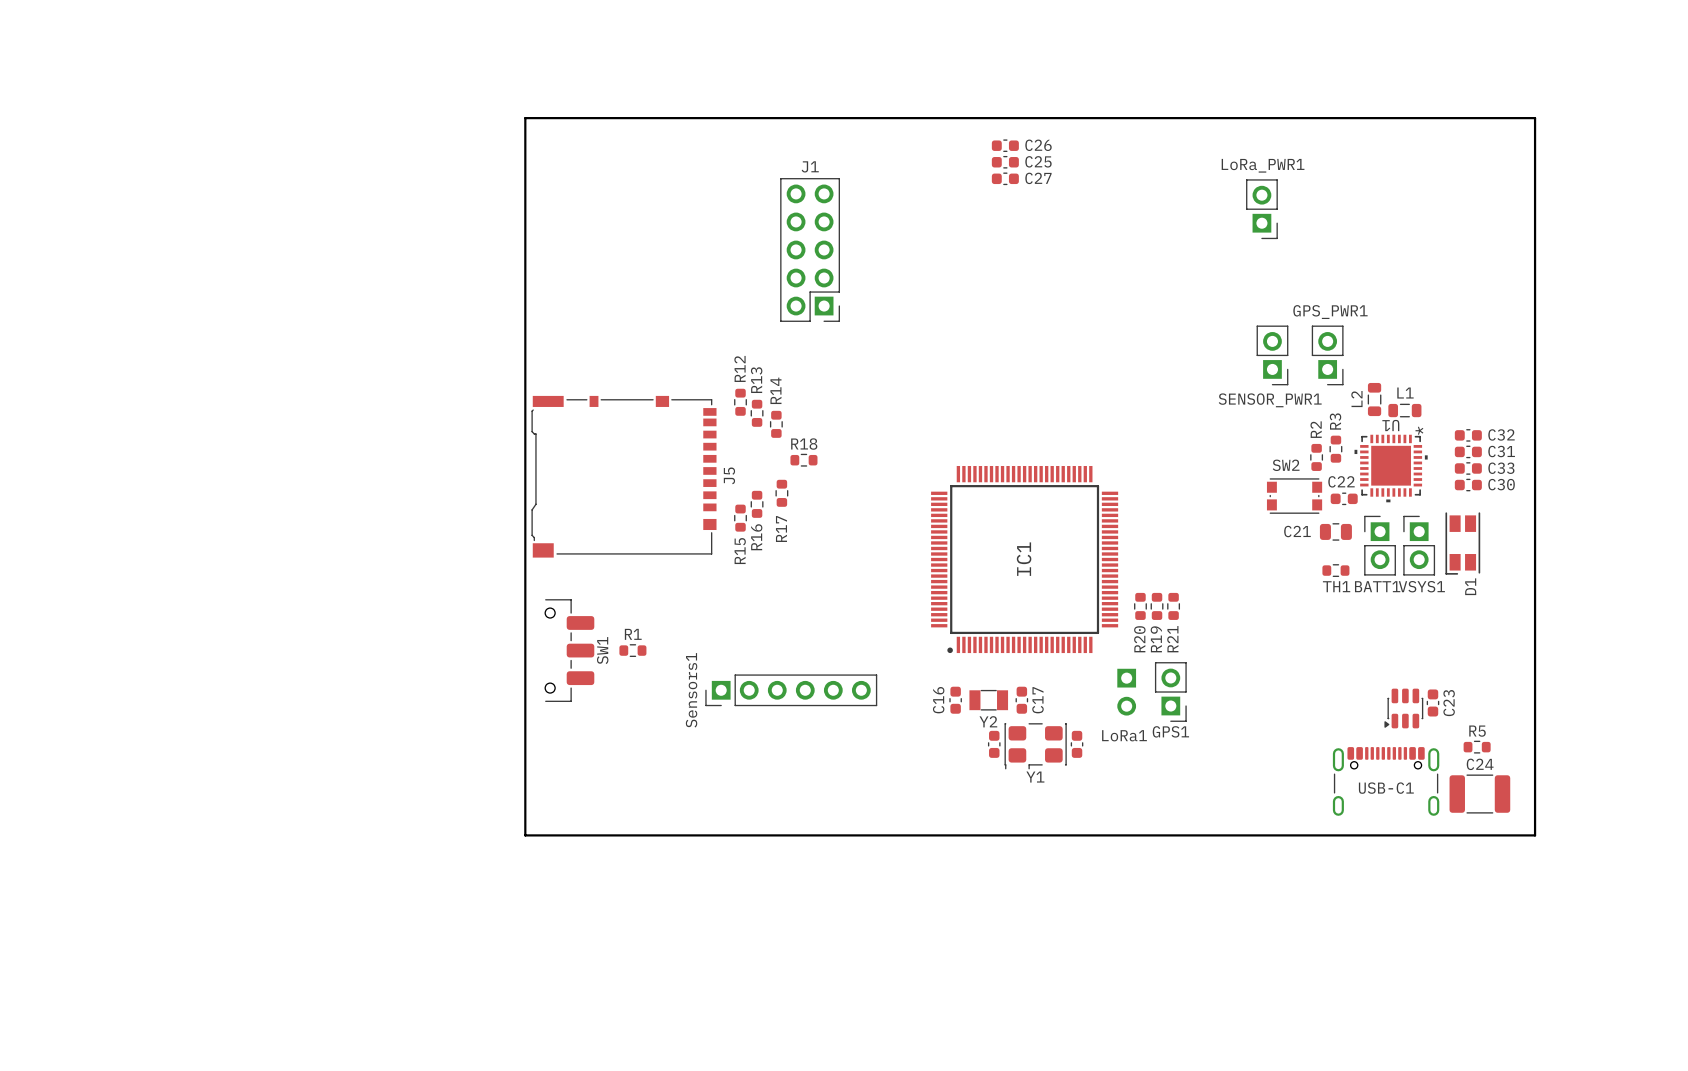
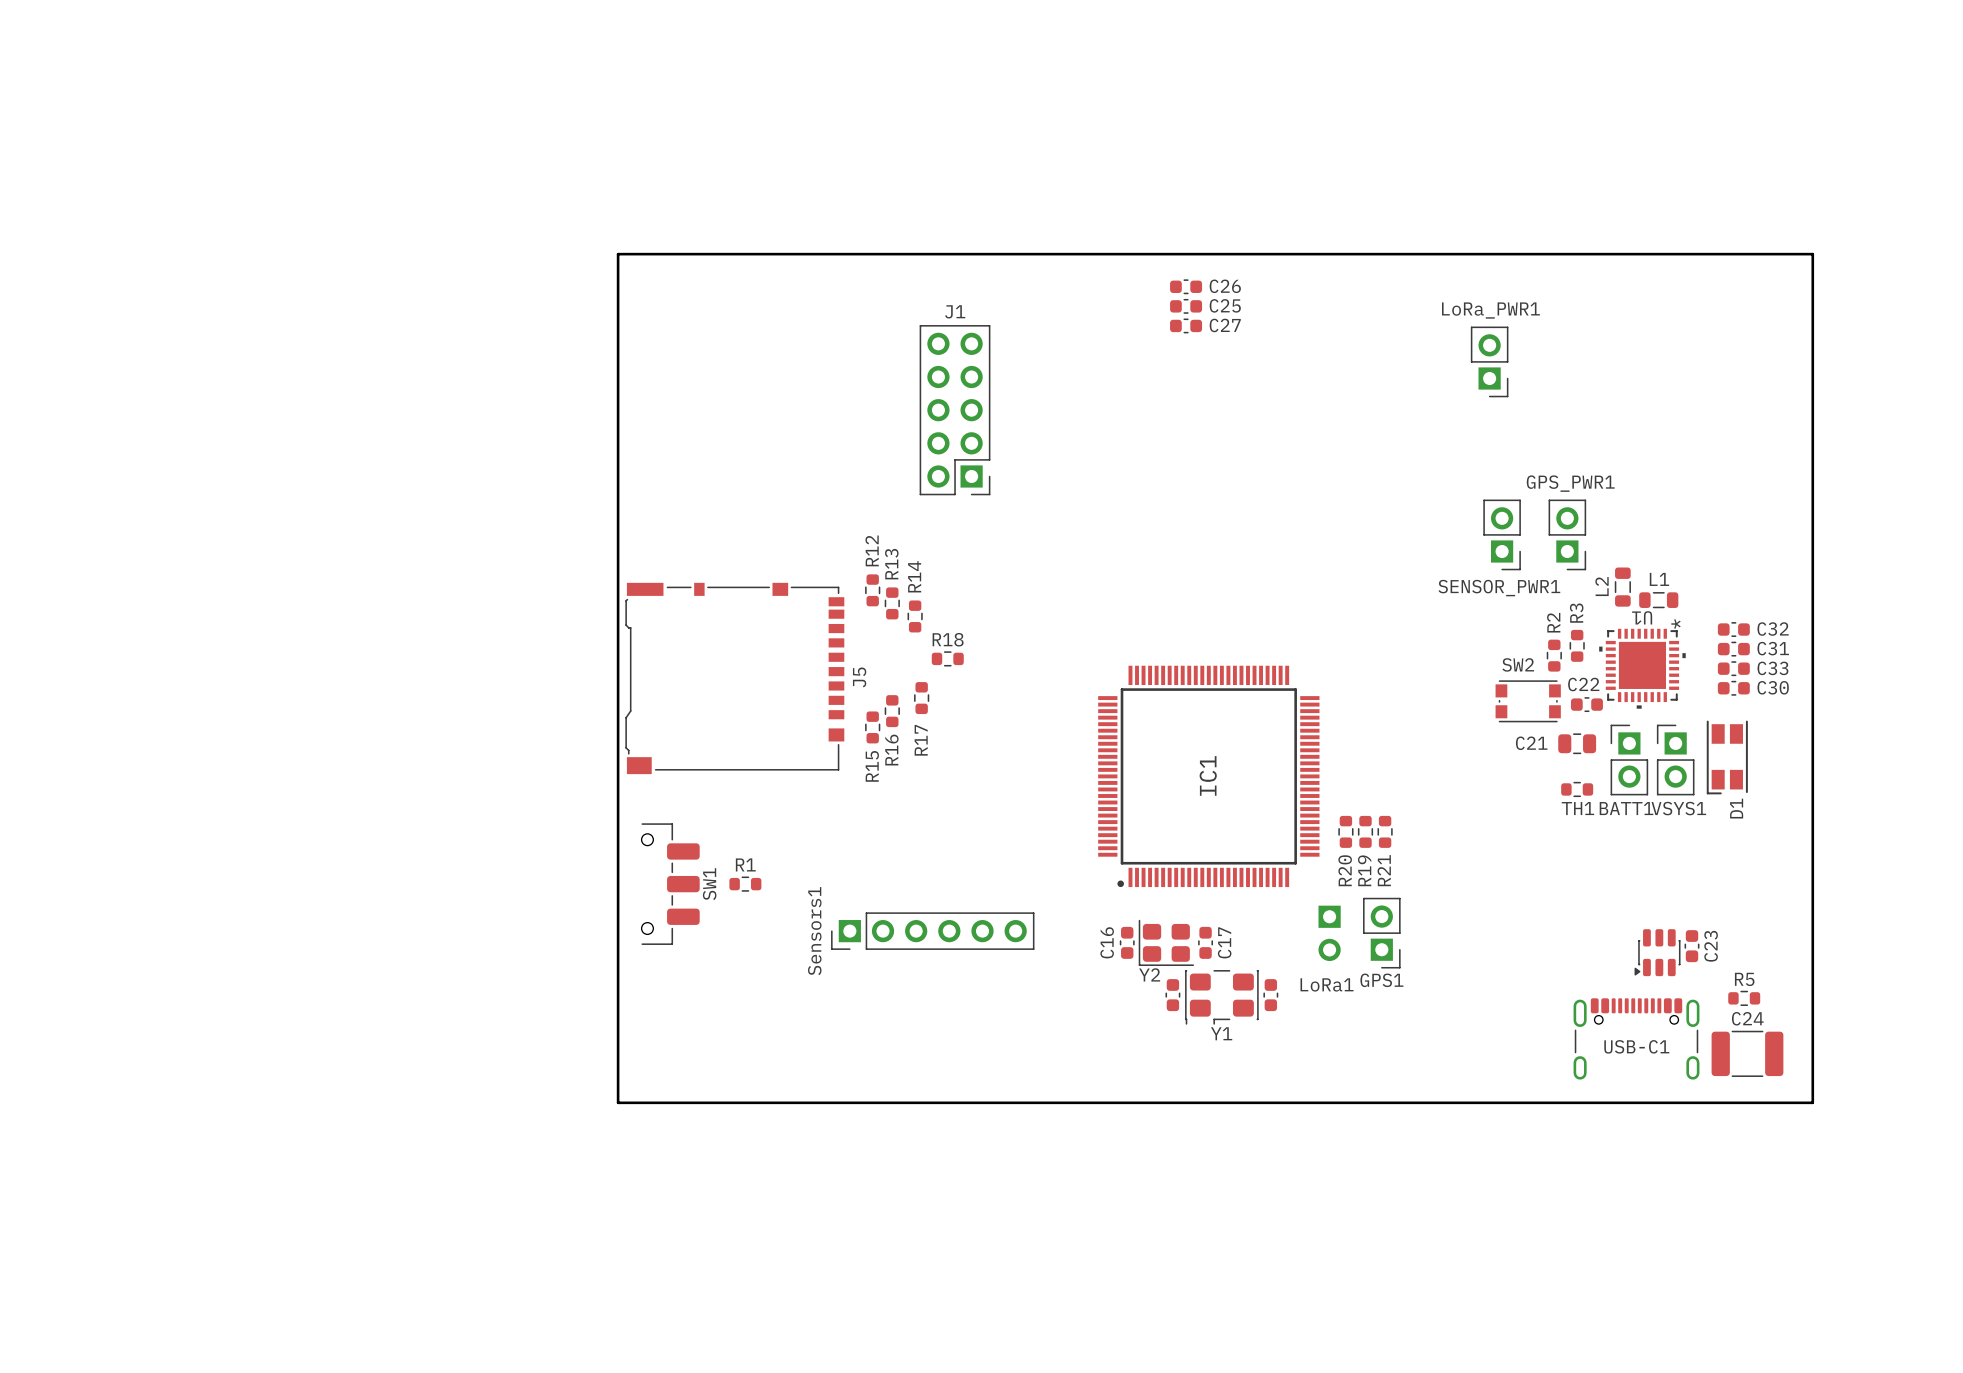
Y2 footprint: [969, 689, 1009, 711] -> [1138, 919, 1195, 966]

